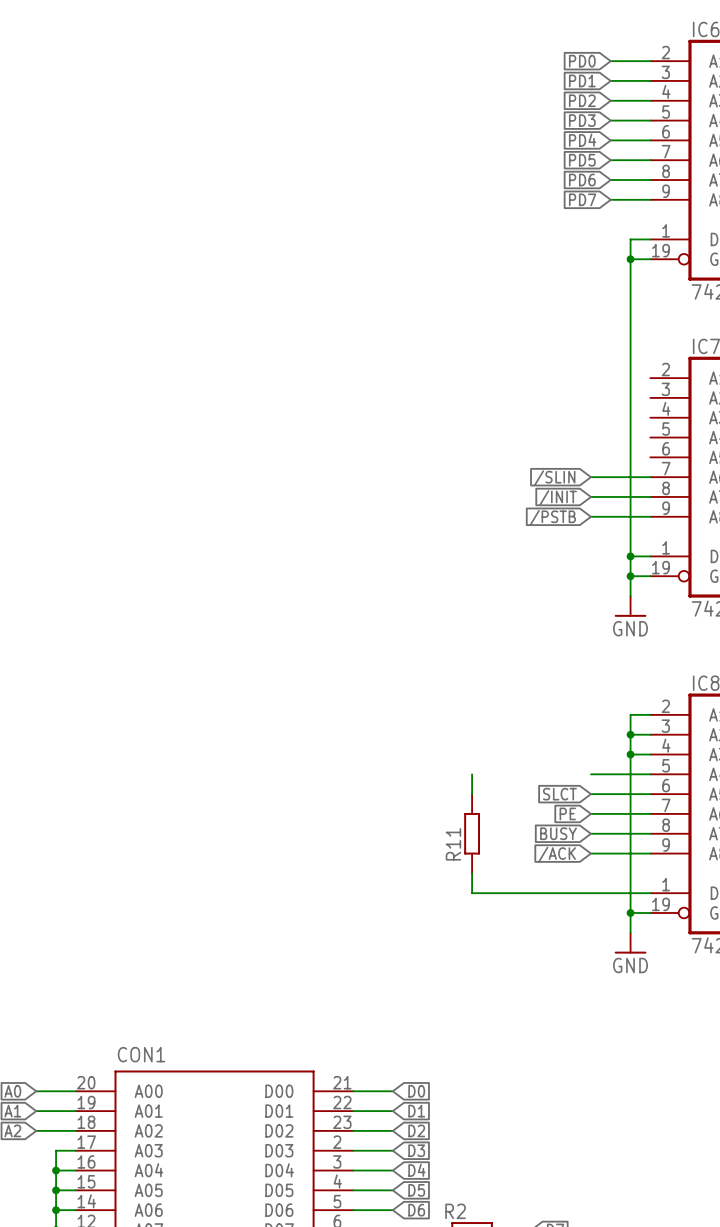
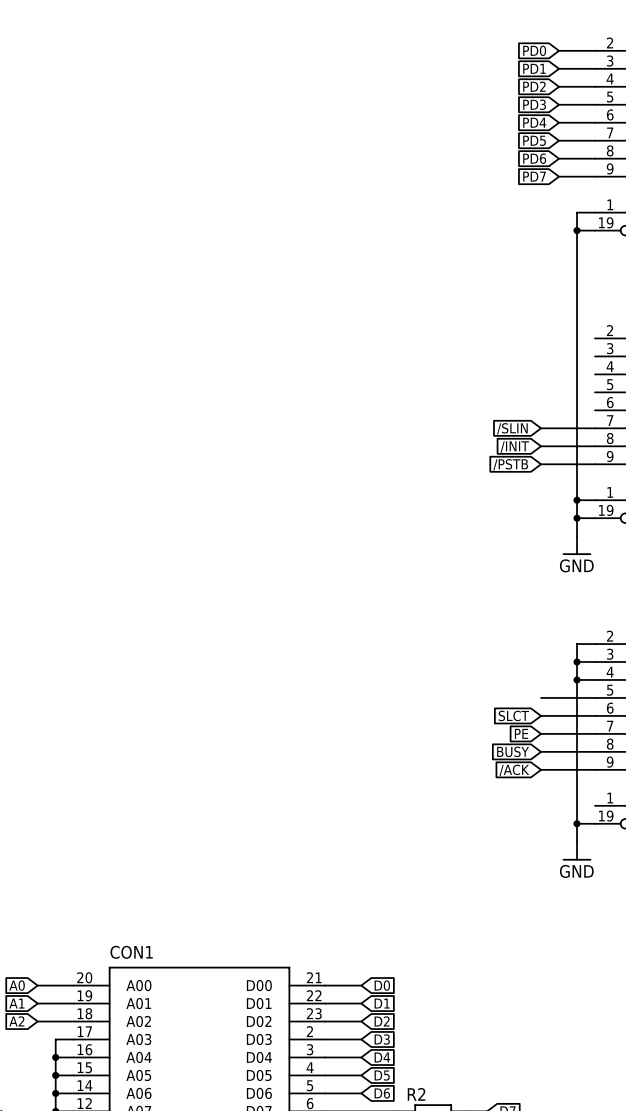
wire: (472, 774) (472, 794) -> none
R11: (472, 833) -> none
wire: (472, 873) (472, 893) (650, 893) -> none

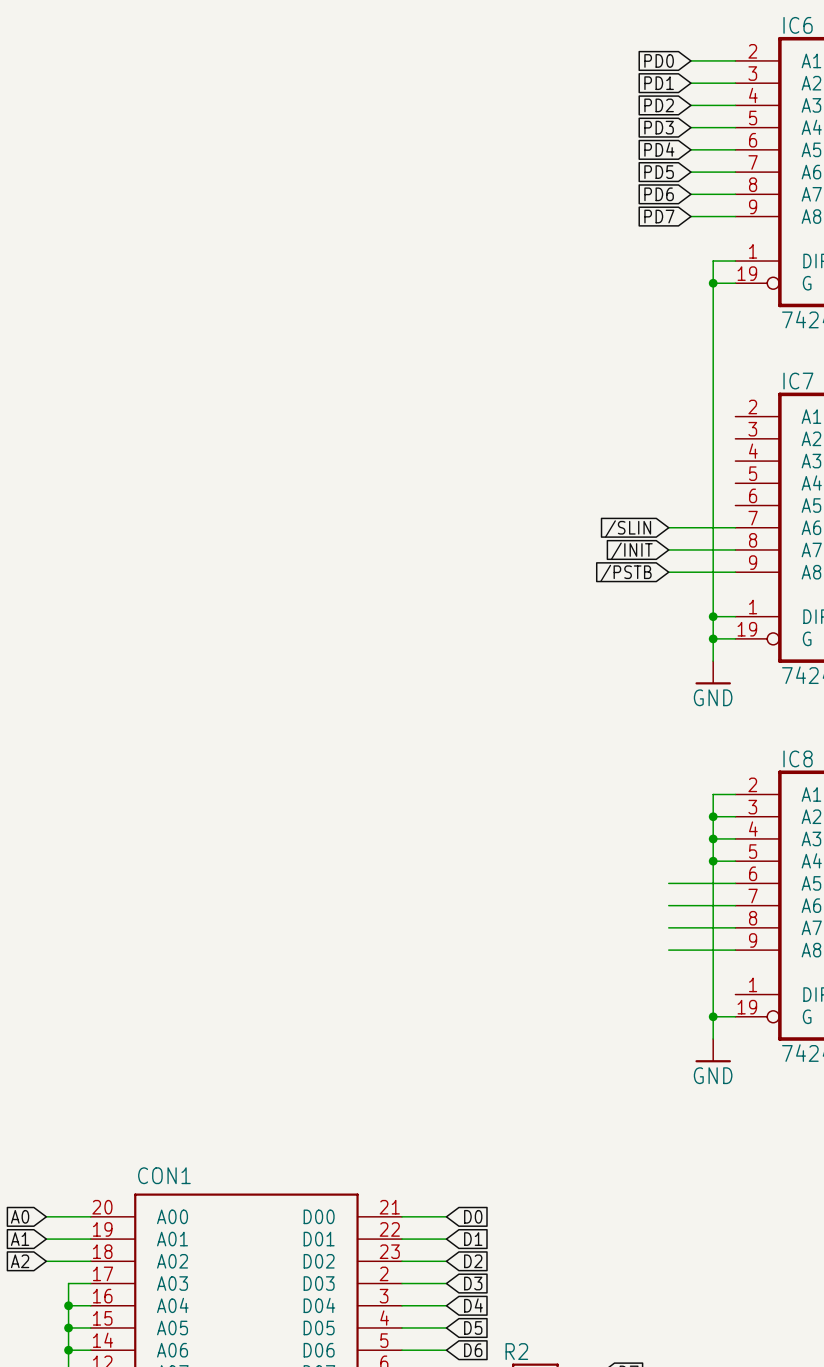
wire: (541, 697) (577, 697) -> none
junction: none -> (713, 861)
global label: SLCT (513, 715) -> none
global label: PE (521, 733) -> none
global label: BUSY (513, 751) -> none
global label: /ACK (514, 770) -> none

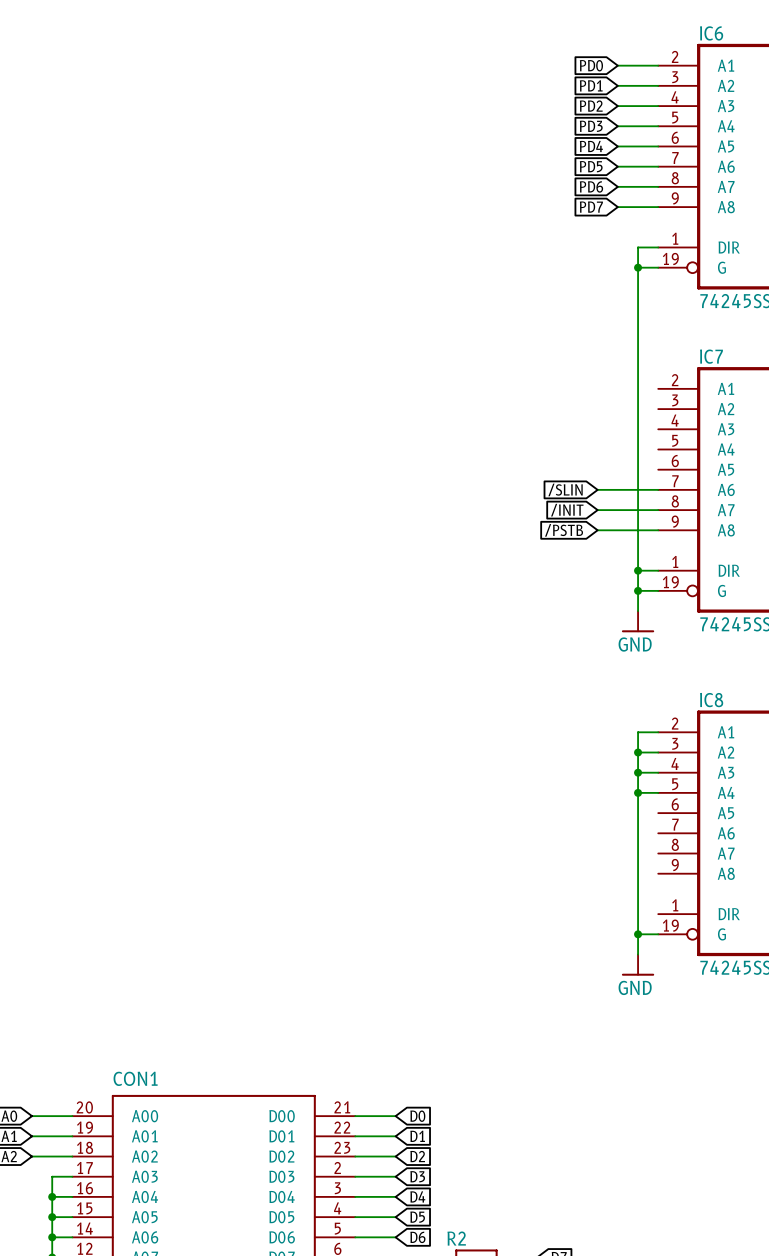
wire: (668, 883) (735, 883) -> none
wire: (668, 905) (735, 905) -> none
wire: (668, 927) (735, 927) -> none
wire: (668, 950) (735, 950) -> none

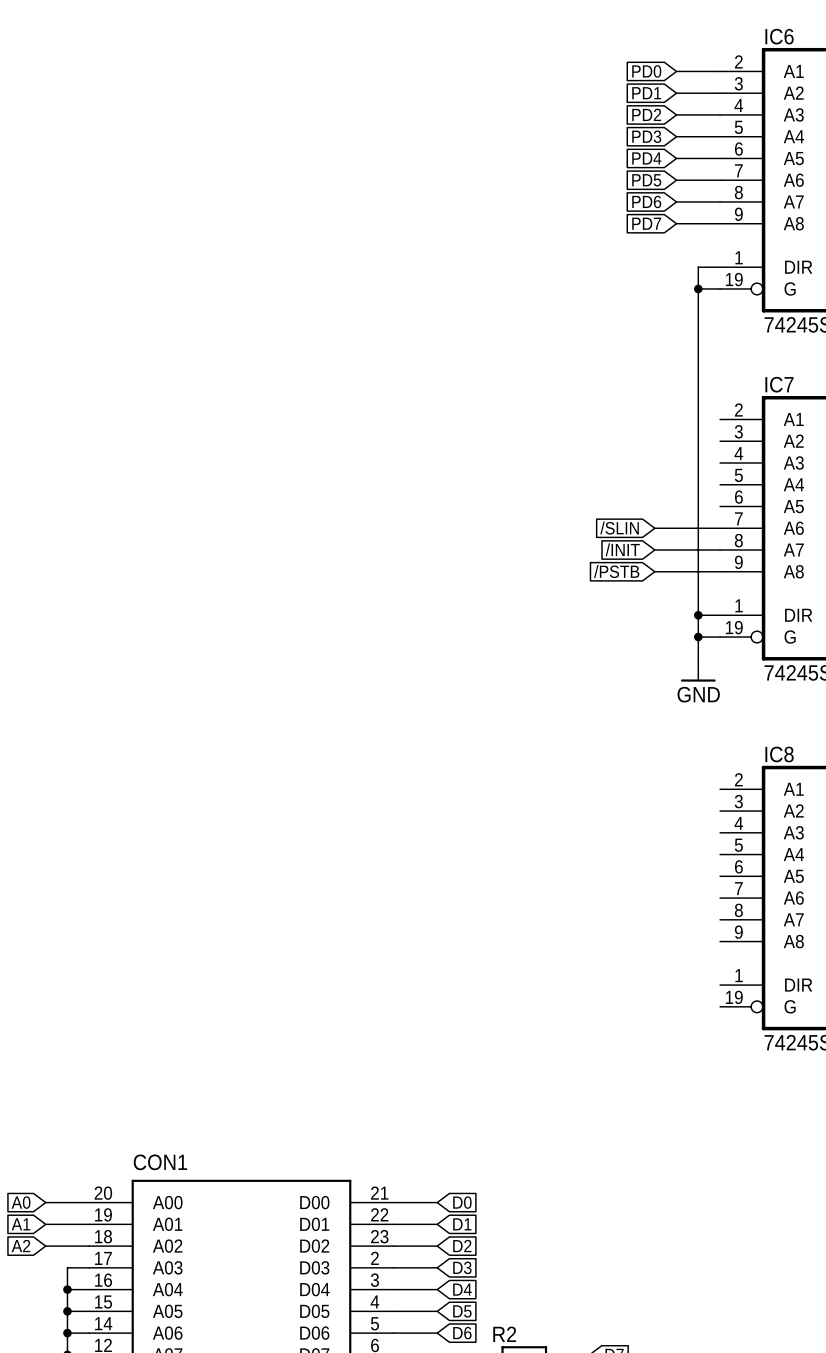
wire: (658, 732) (638, 732) (638, 954) -> none
wire: (638, 752) (658, 752) -> none
junction: (638, 752) -> none
wire: (638, 772) (658, 772) -> none
junction: (638, 772) -> none
wire: (638, 792) (658, 792) -> none
junction: (638, 792) -> none
wire: (638, 934) (658, 934) -> none
junction: (638, 934) -> none
power symbol: GND (638, 965) -> none

